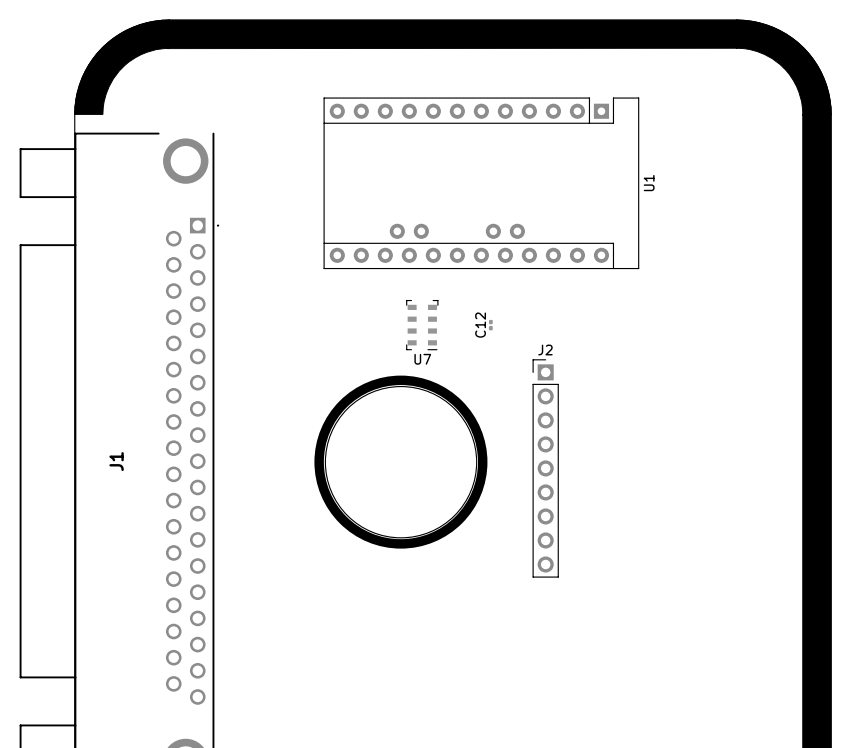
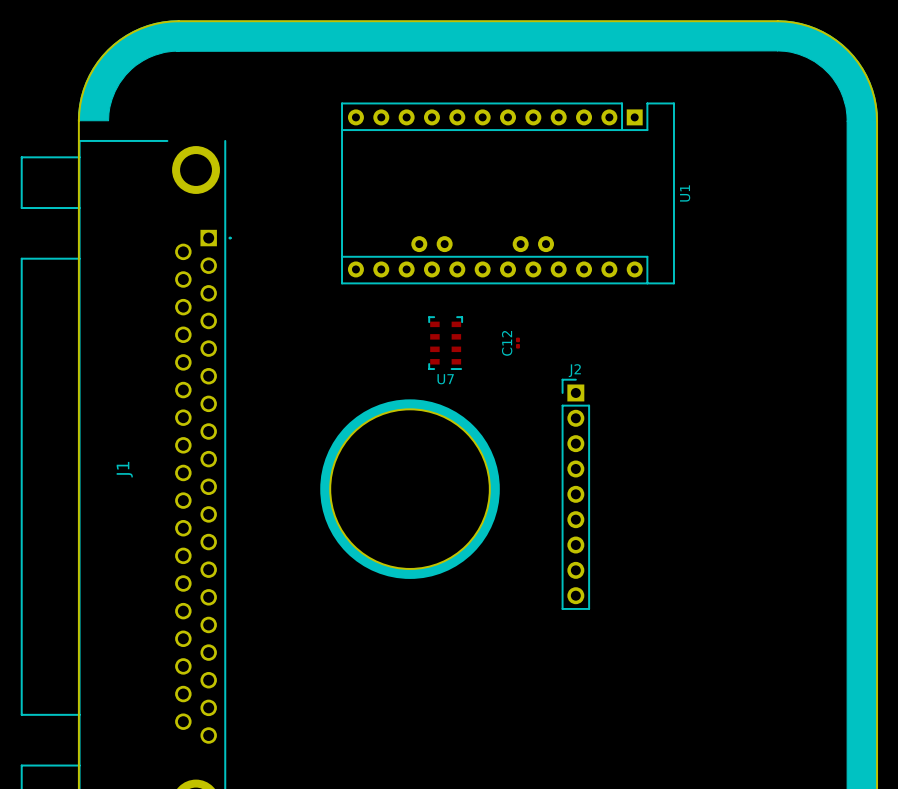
drawing: [314, 375, 488, 549] -> none
drawing: none -> [320, 399, 500, 579]
J1 name position: J1 (116, 461) -> J1 (124, 469)
round board edge position: (401, 462) -> (410, 489)

